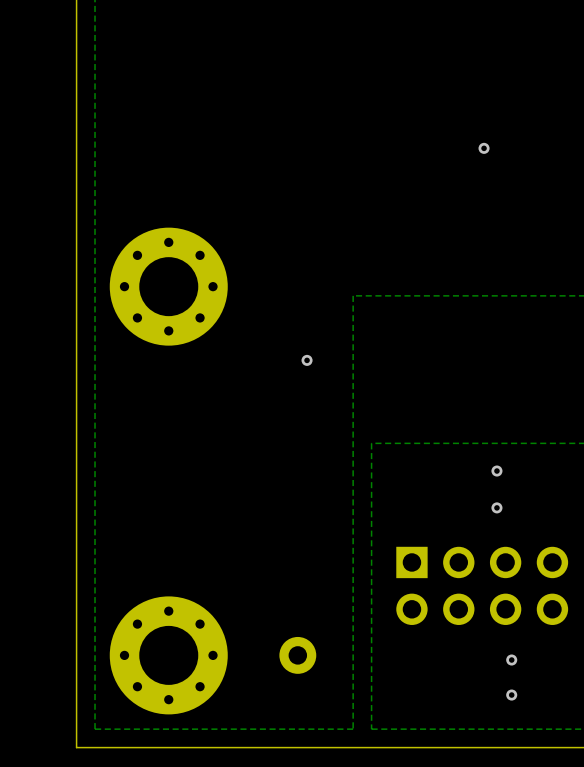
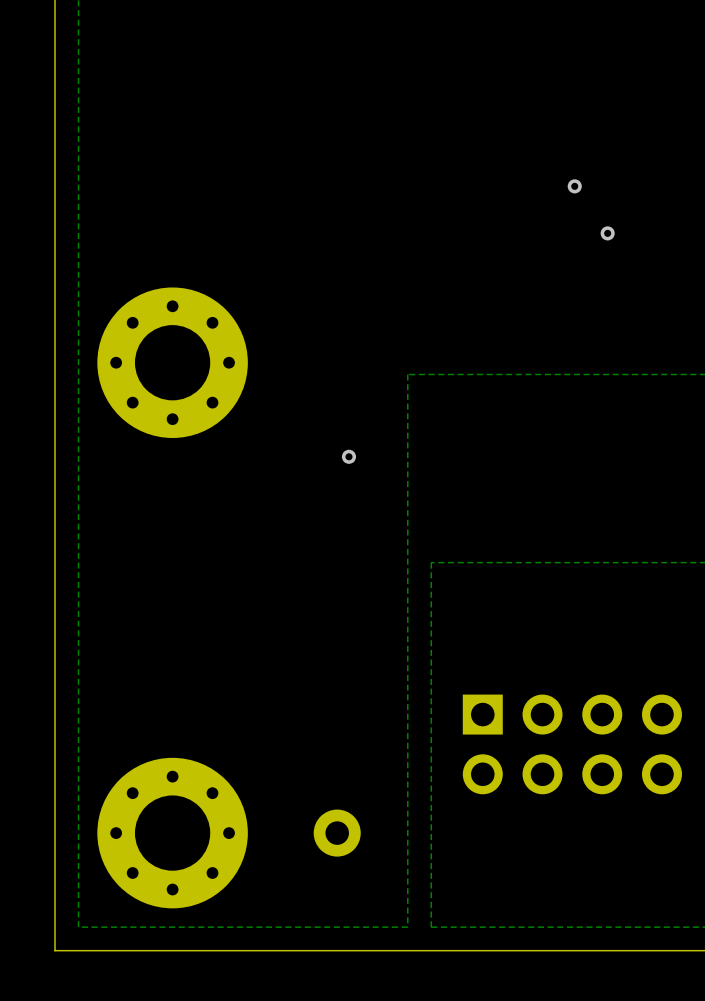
via: none -> (607, 233)
via: (496, 471) -> none
via: (496, 507) -> none
via: (511, 660) -> none
via: (511, 695) -> none

